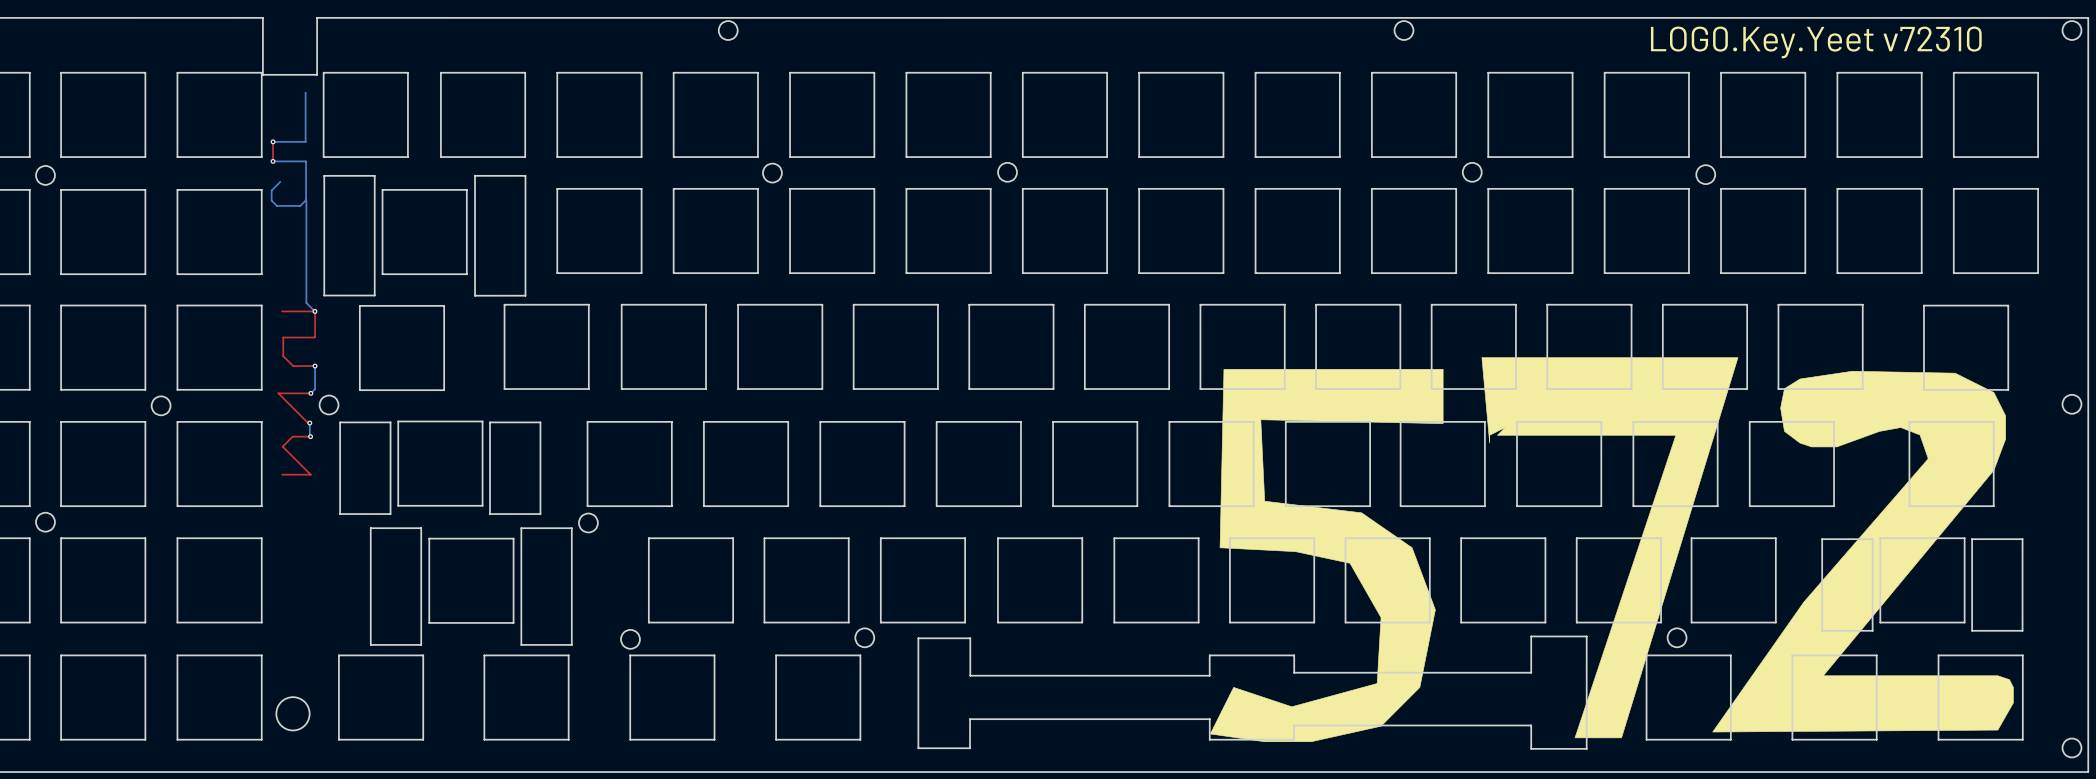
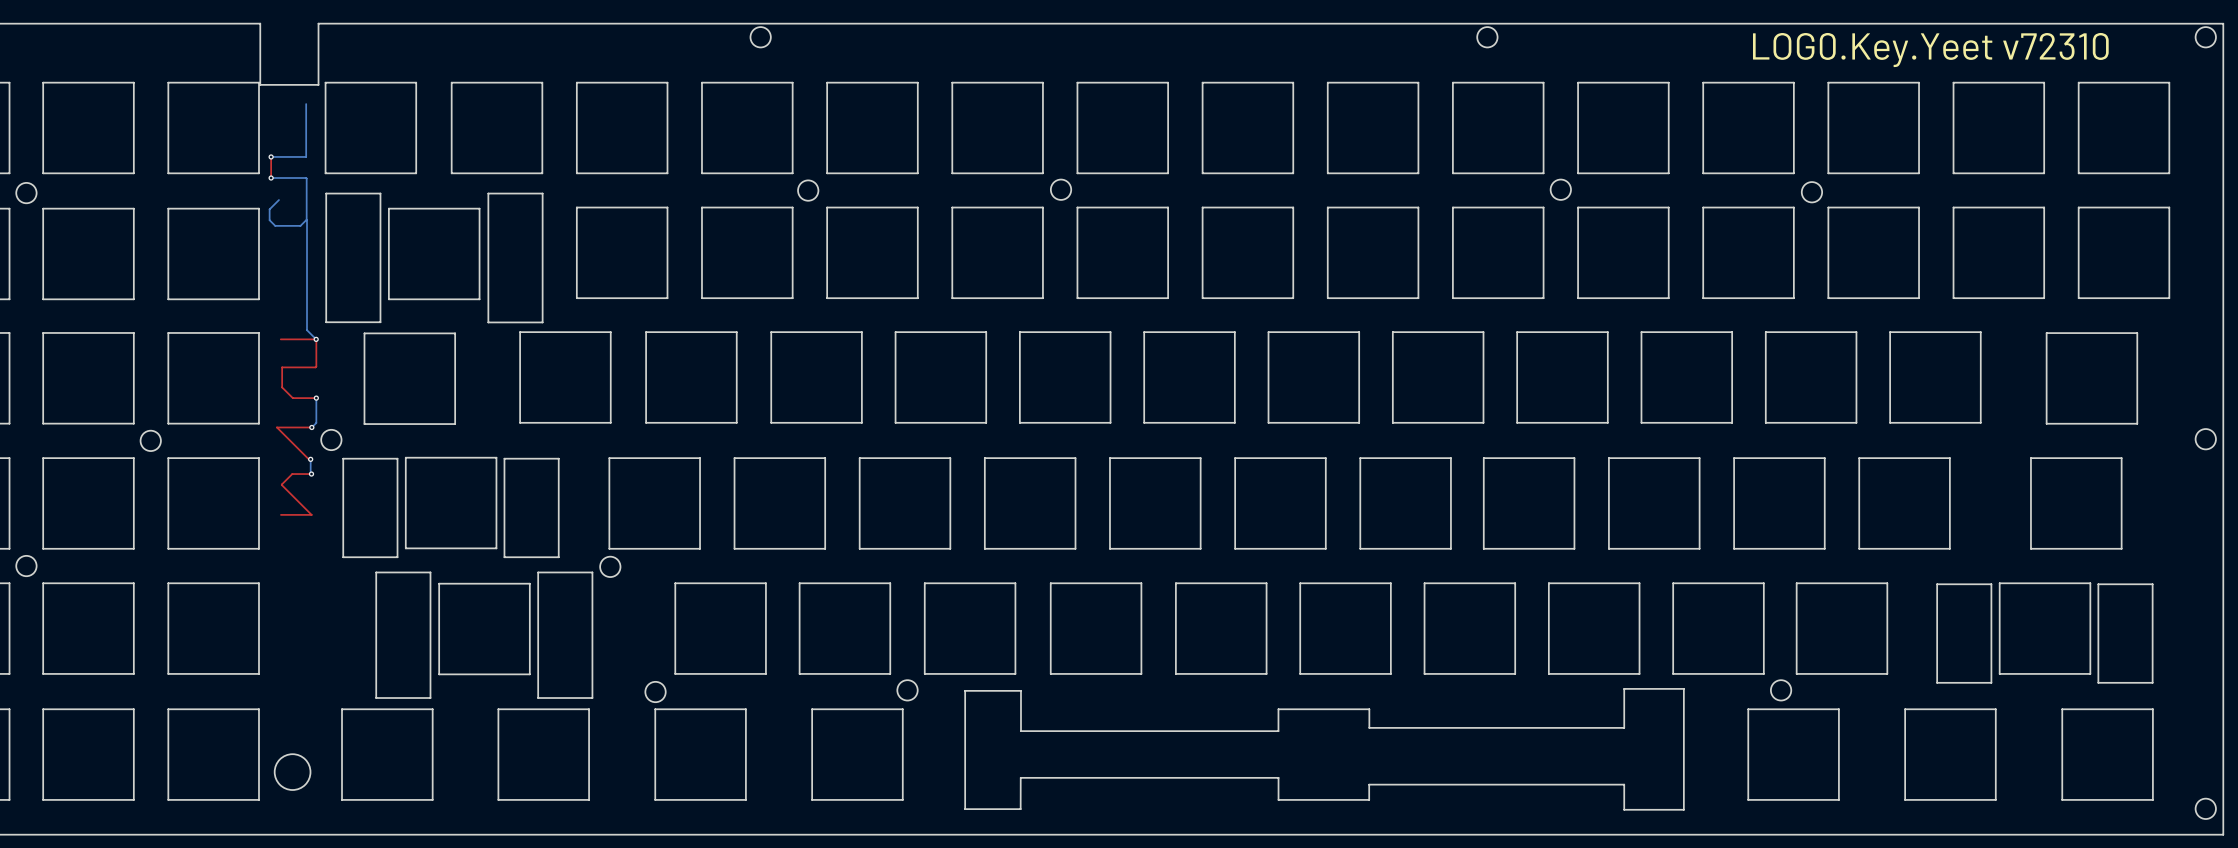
drawing: [1481, 357, 2014, 739] -> none
drawing: [1210, 369, 1444, 743] -> none

